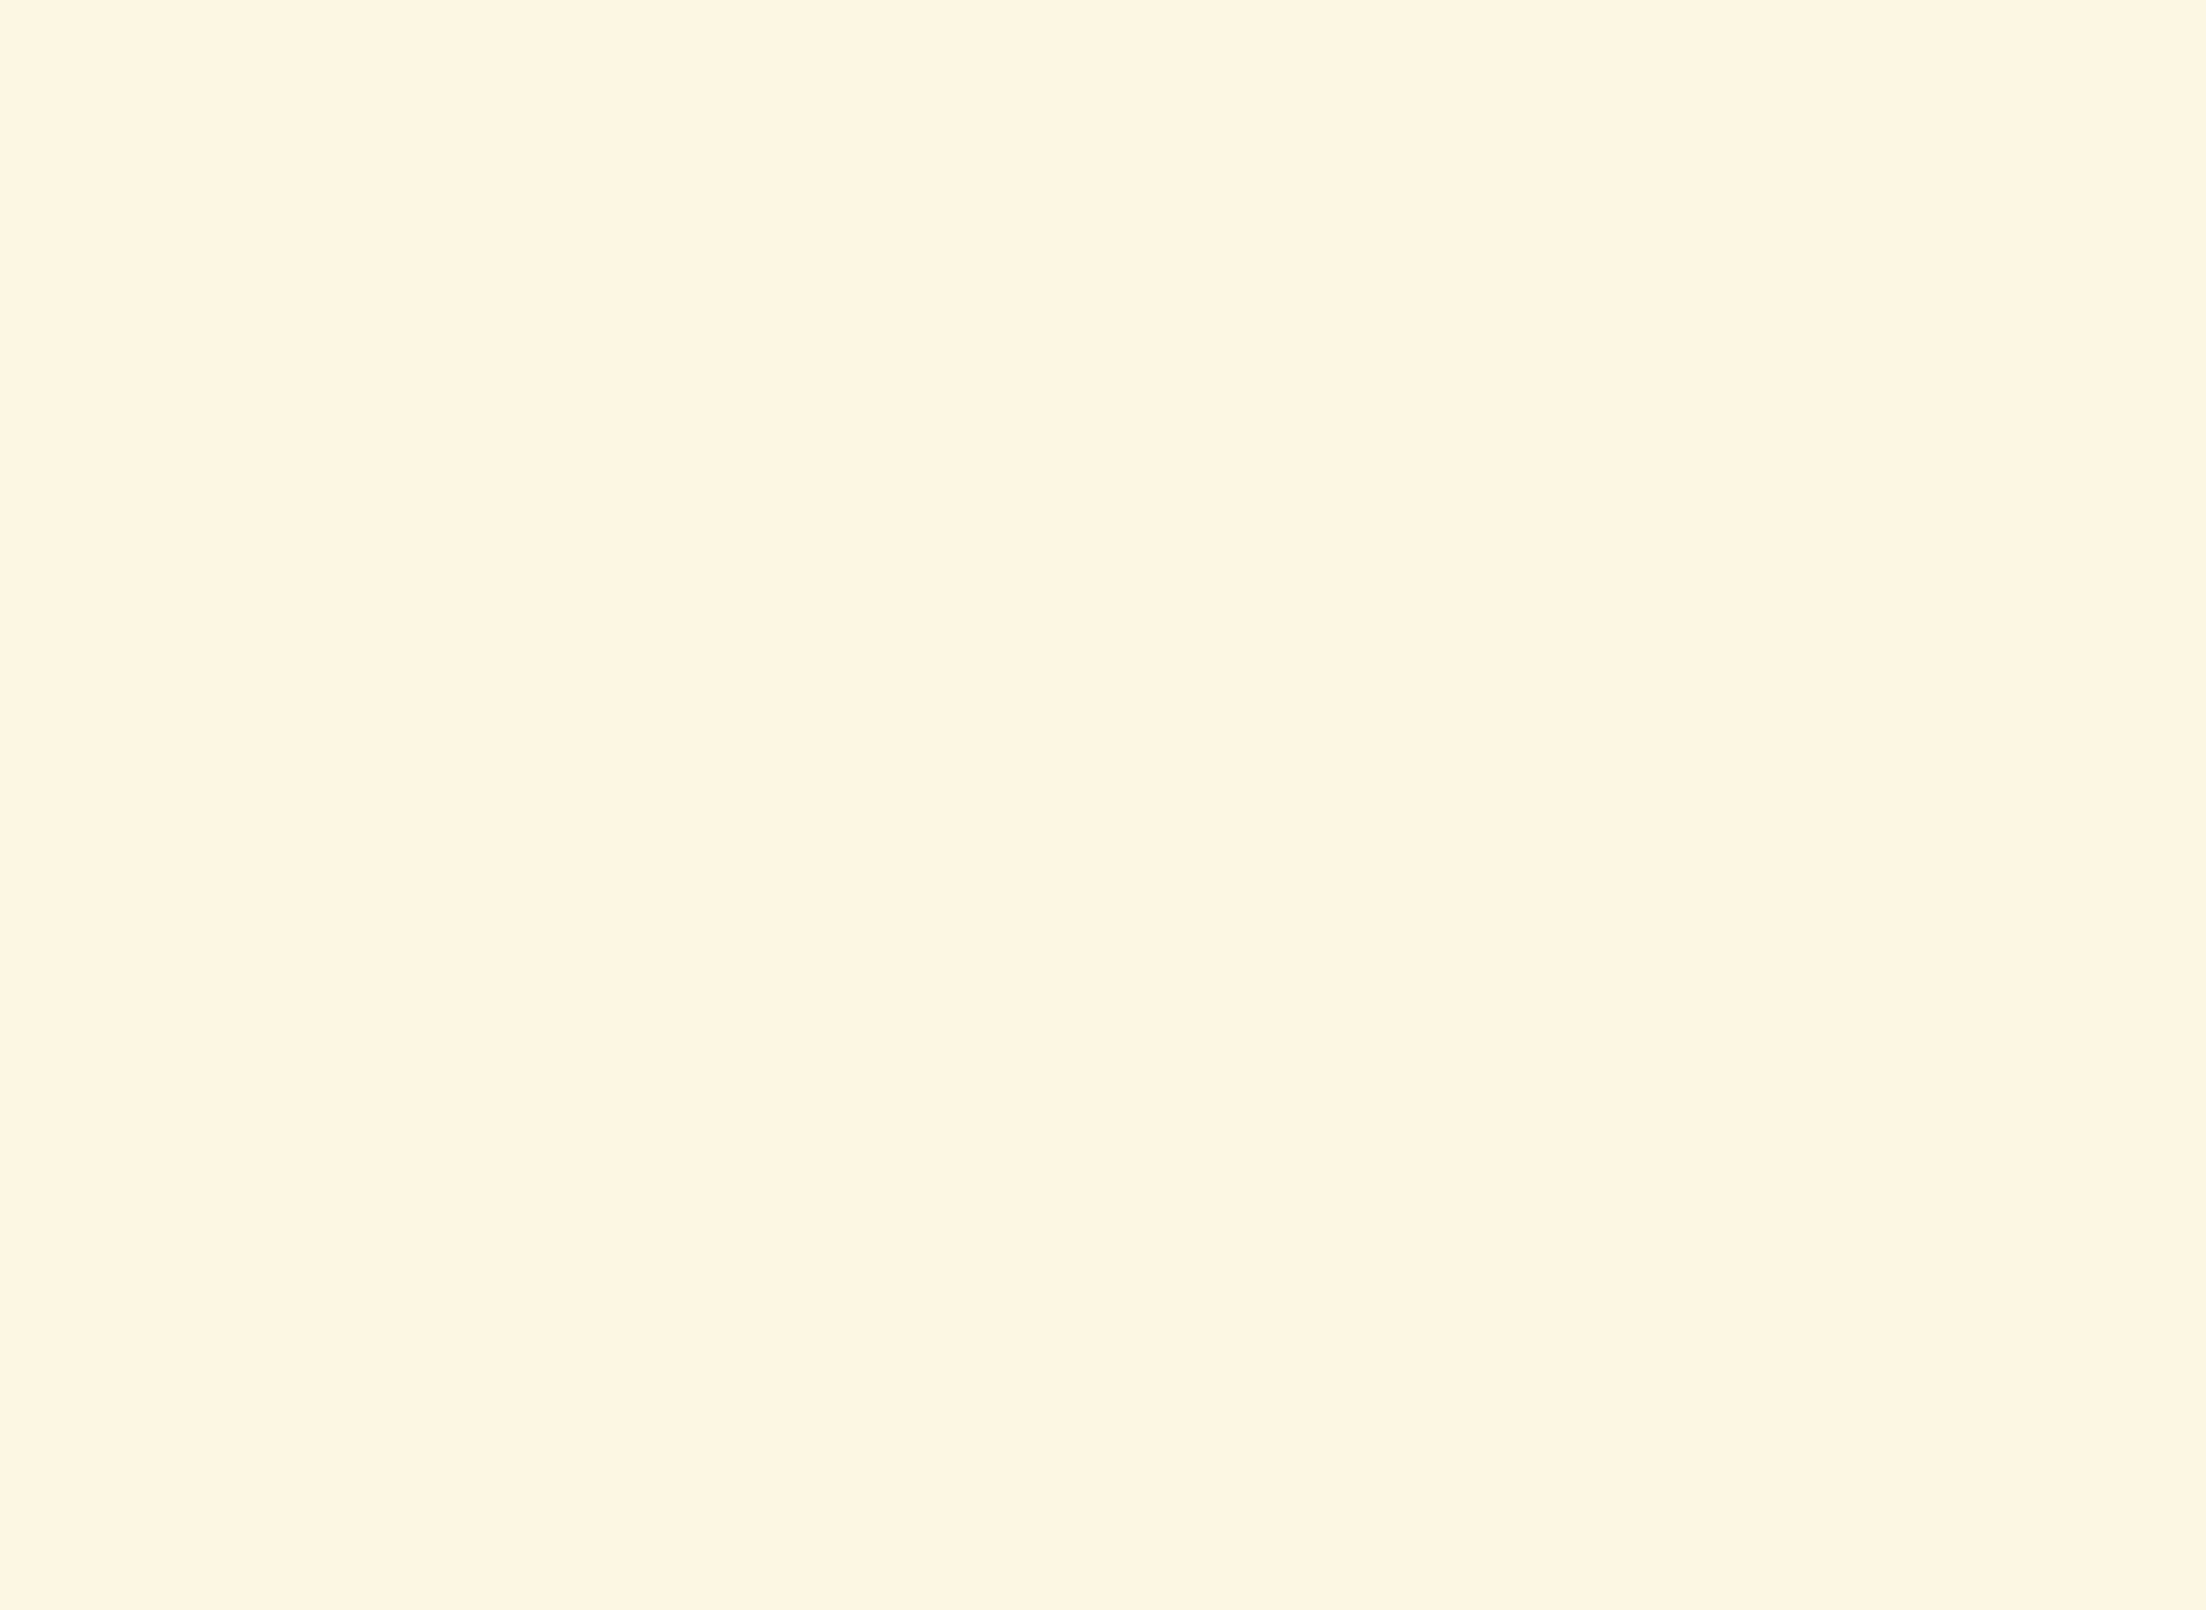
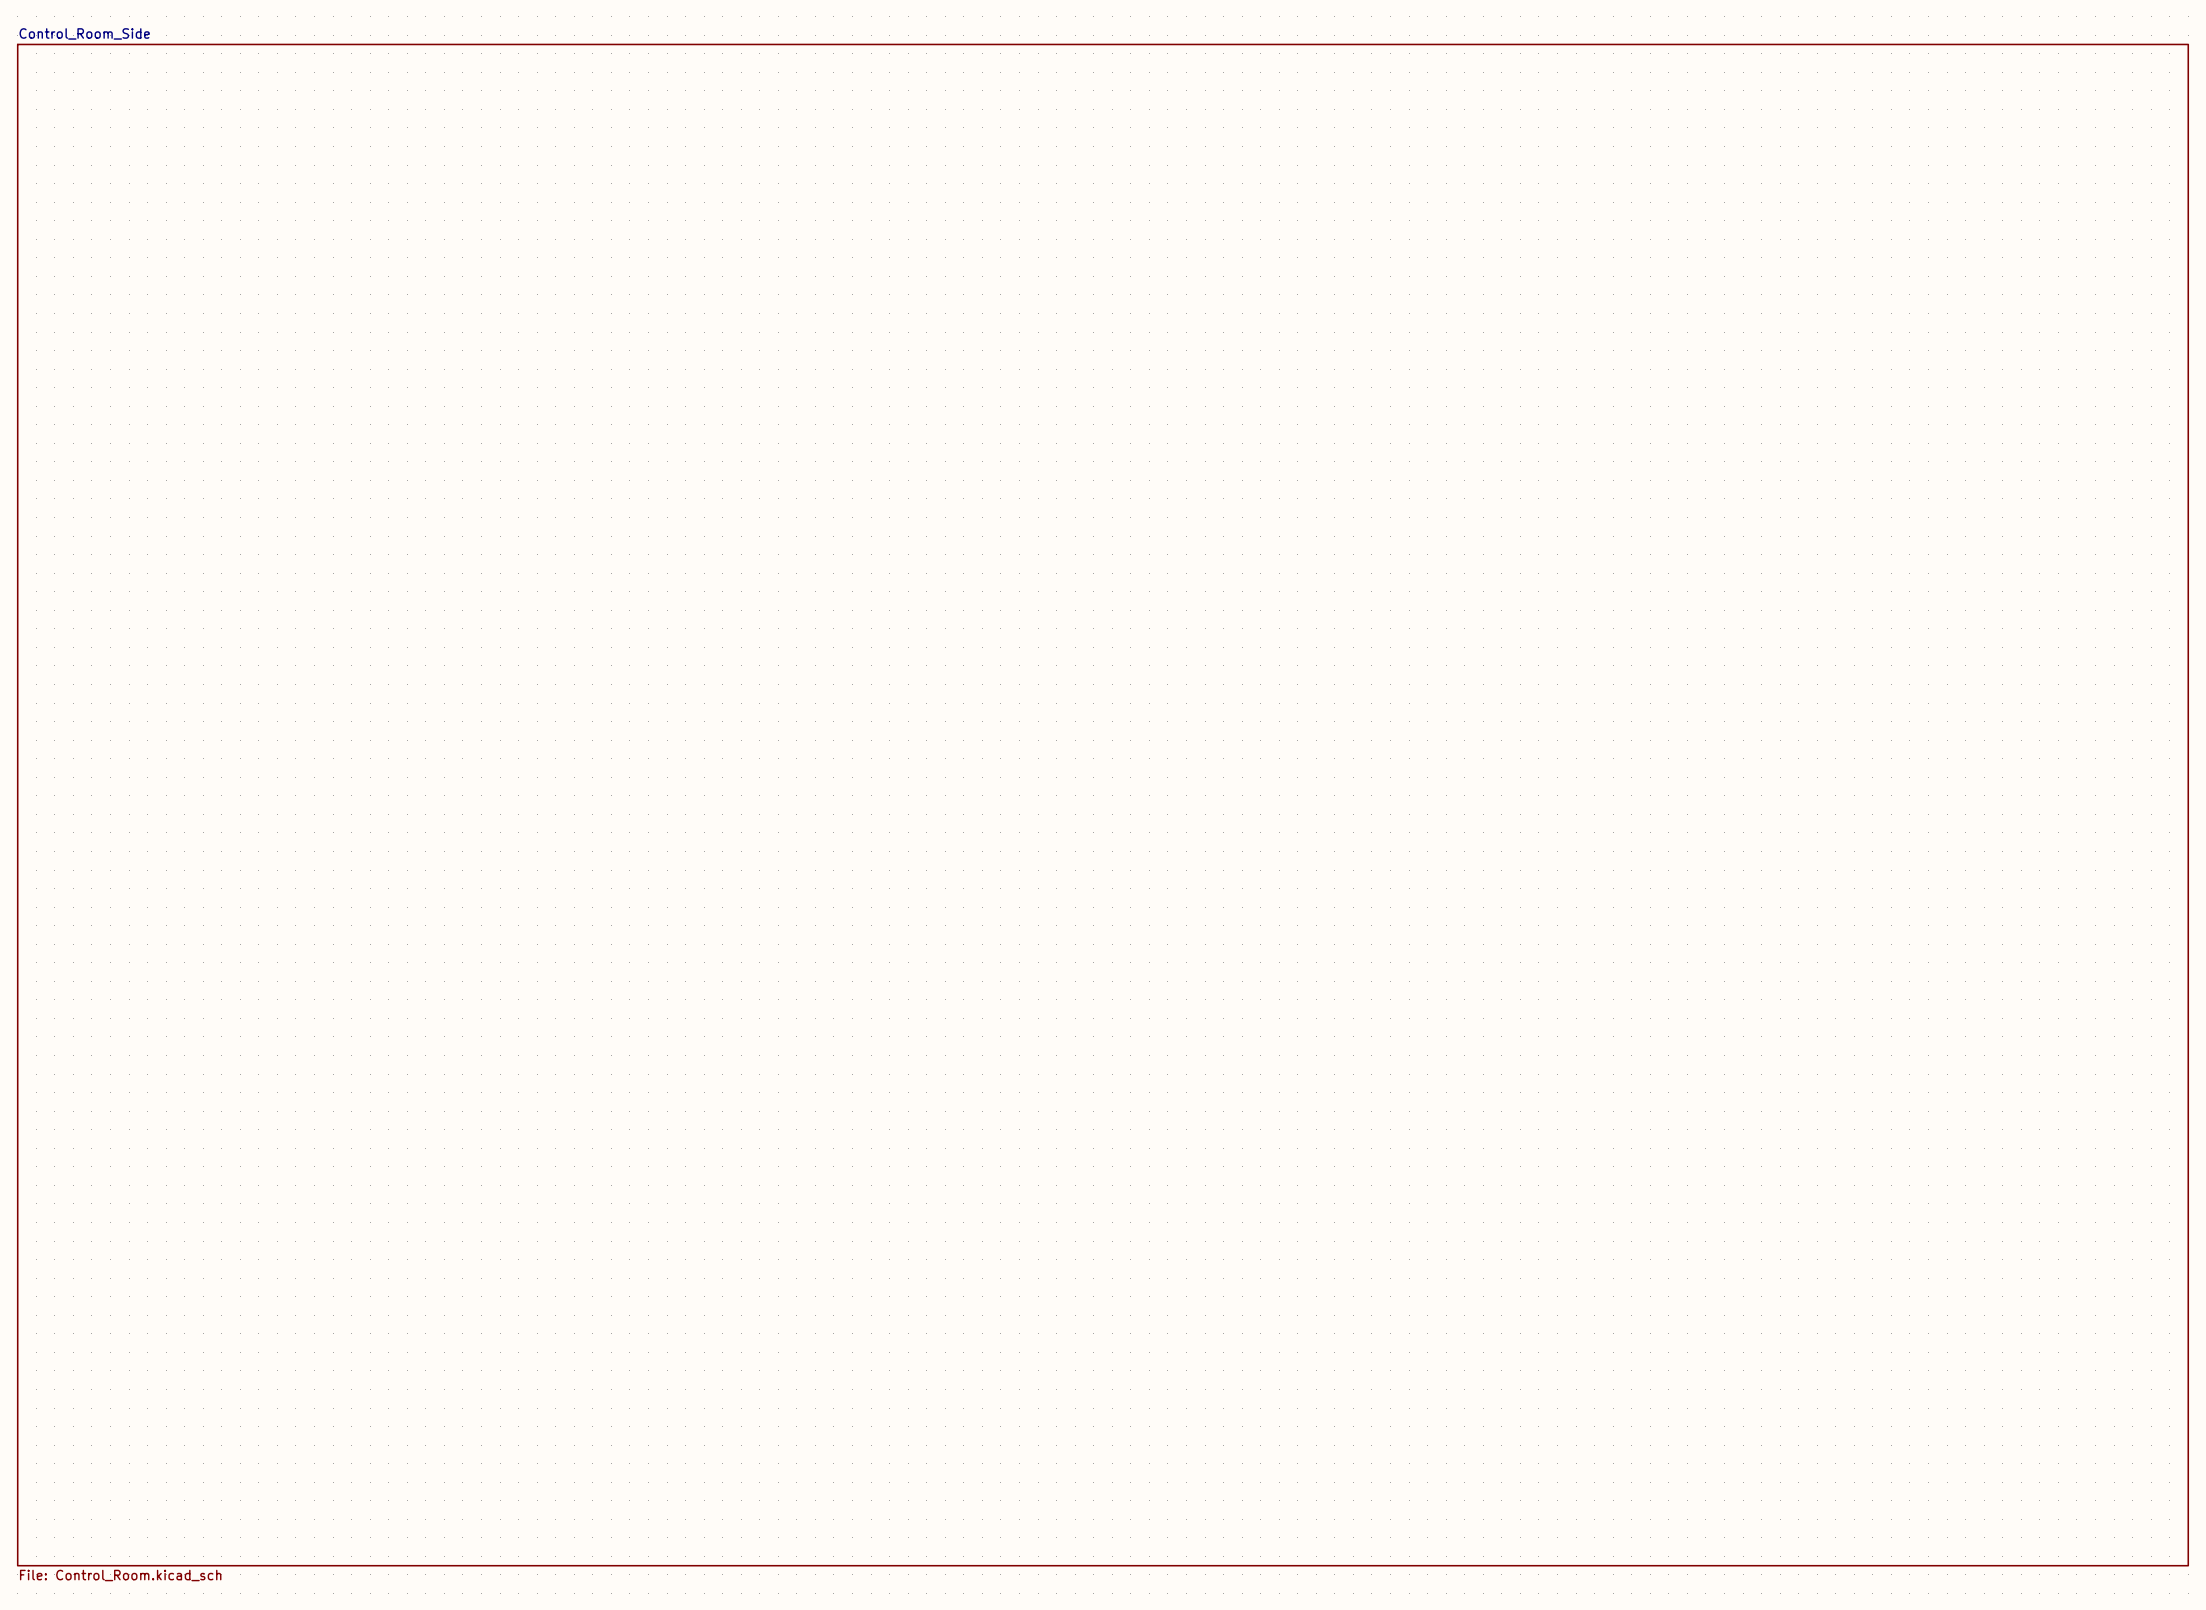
sheet Control_Room_Side: none -> File: Control_Room.kicad_sch (1102, 805)

